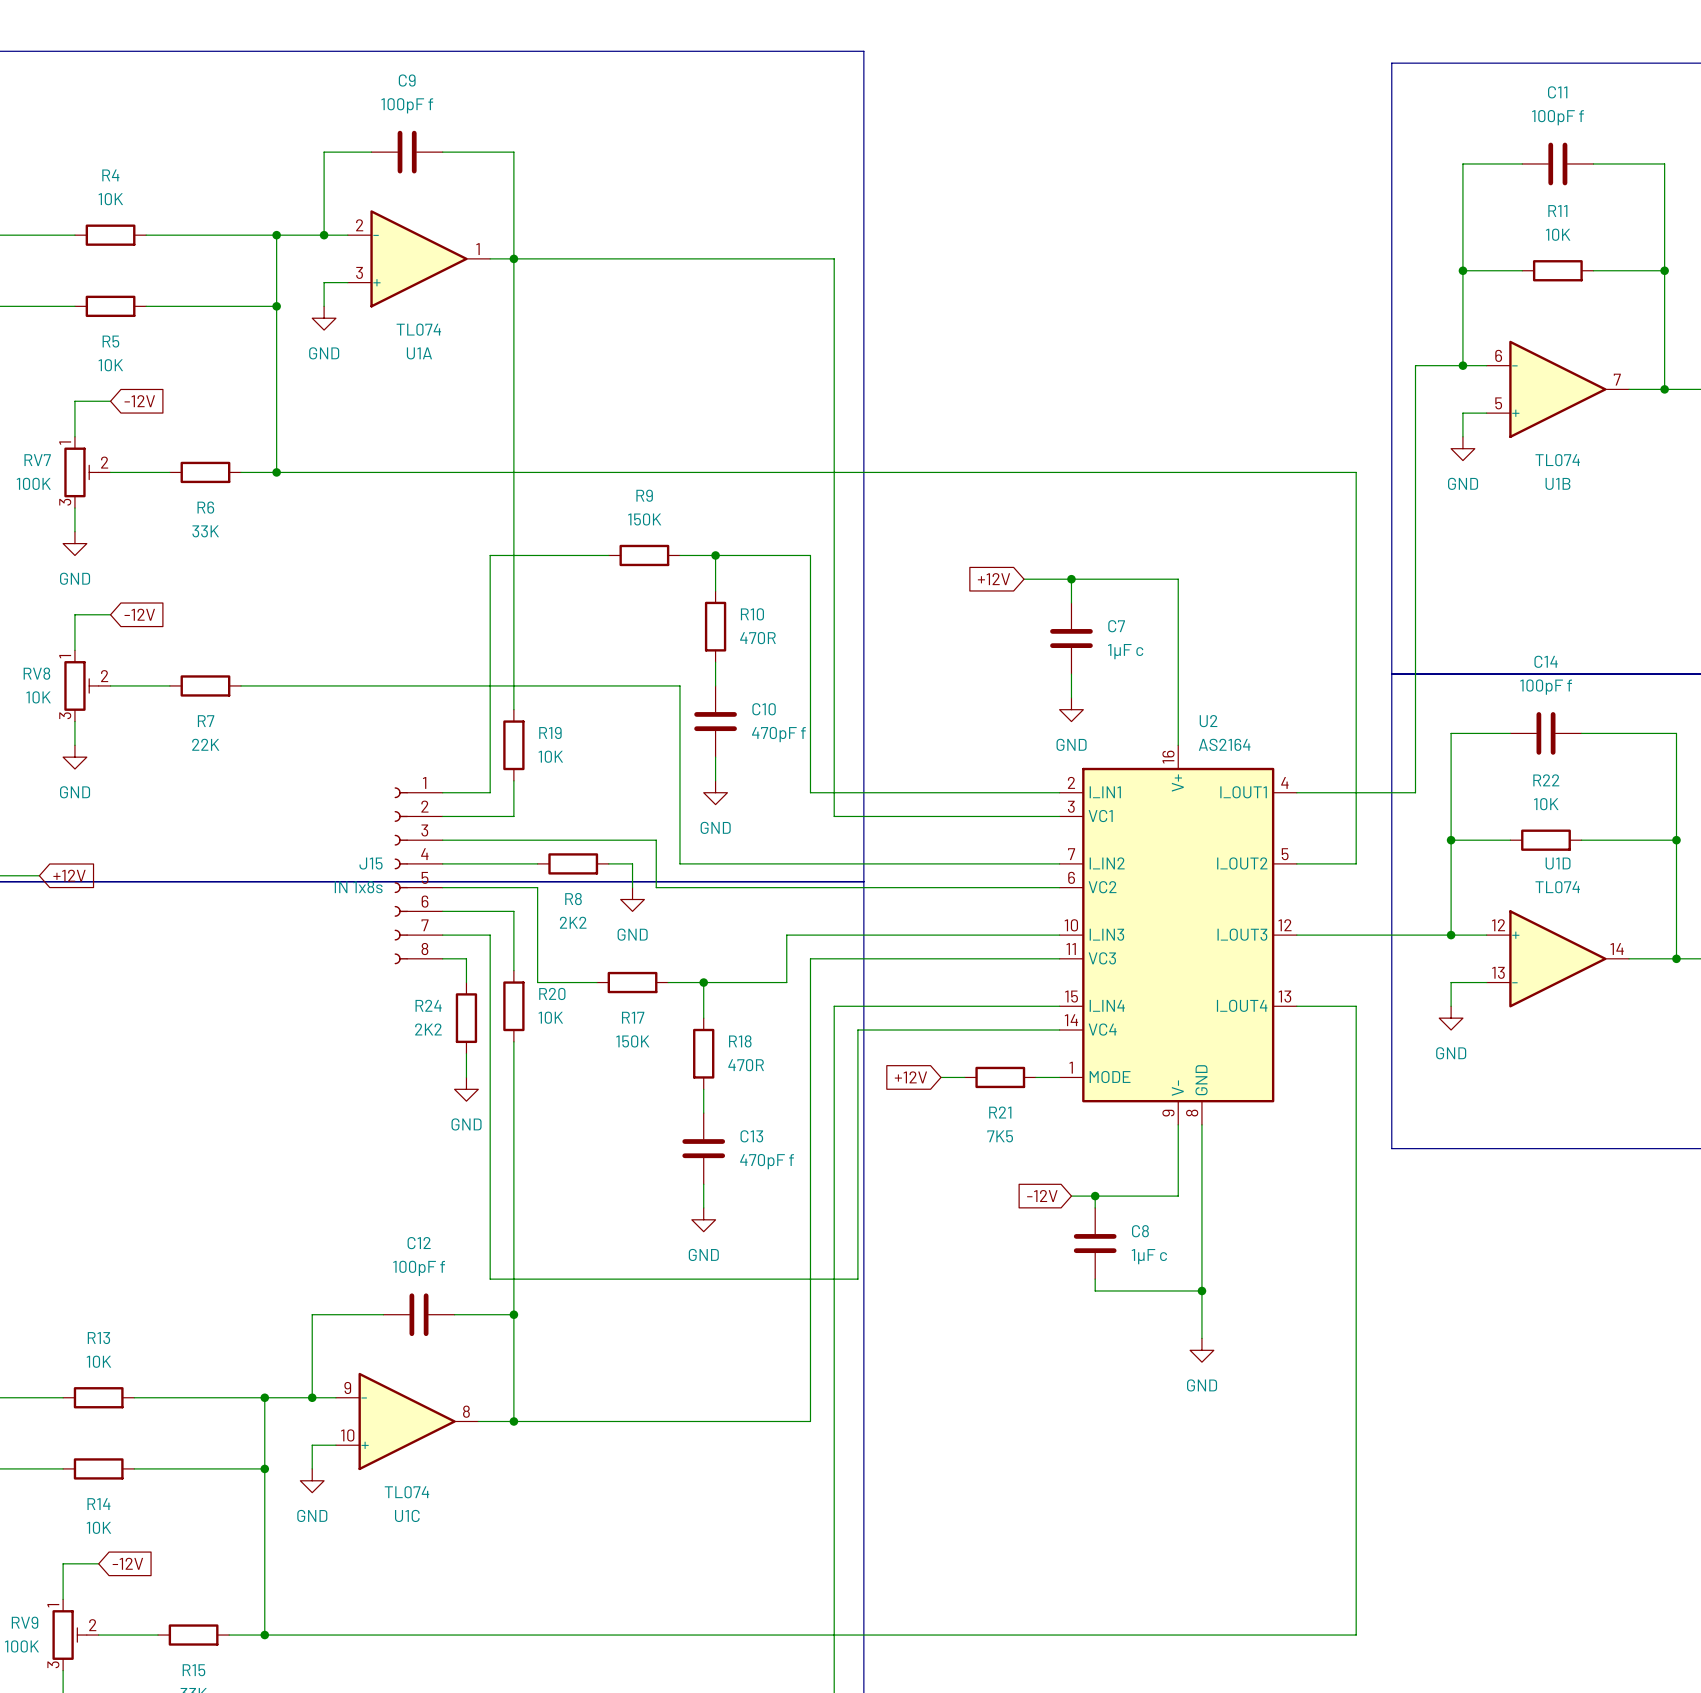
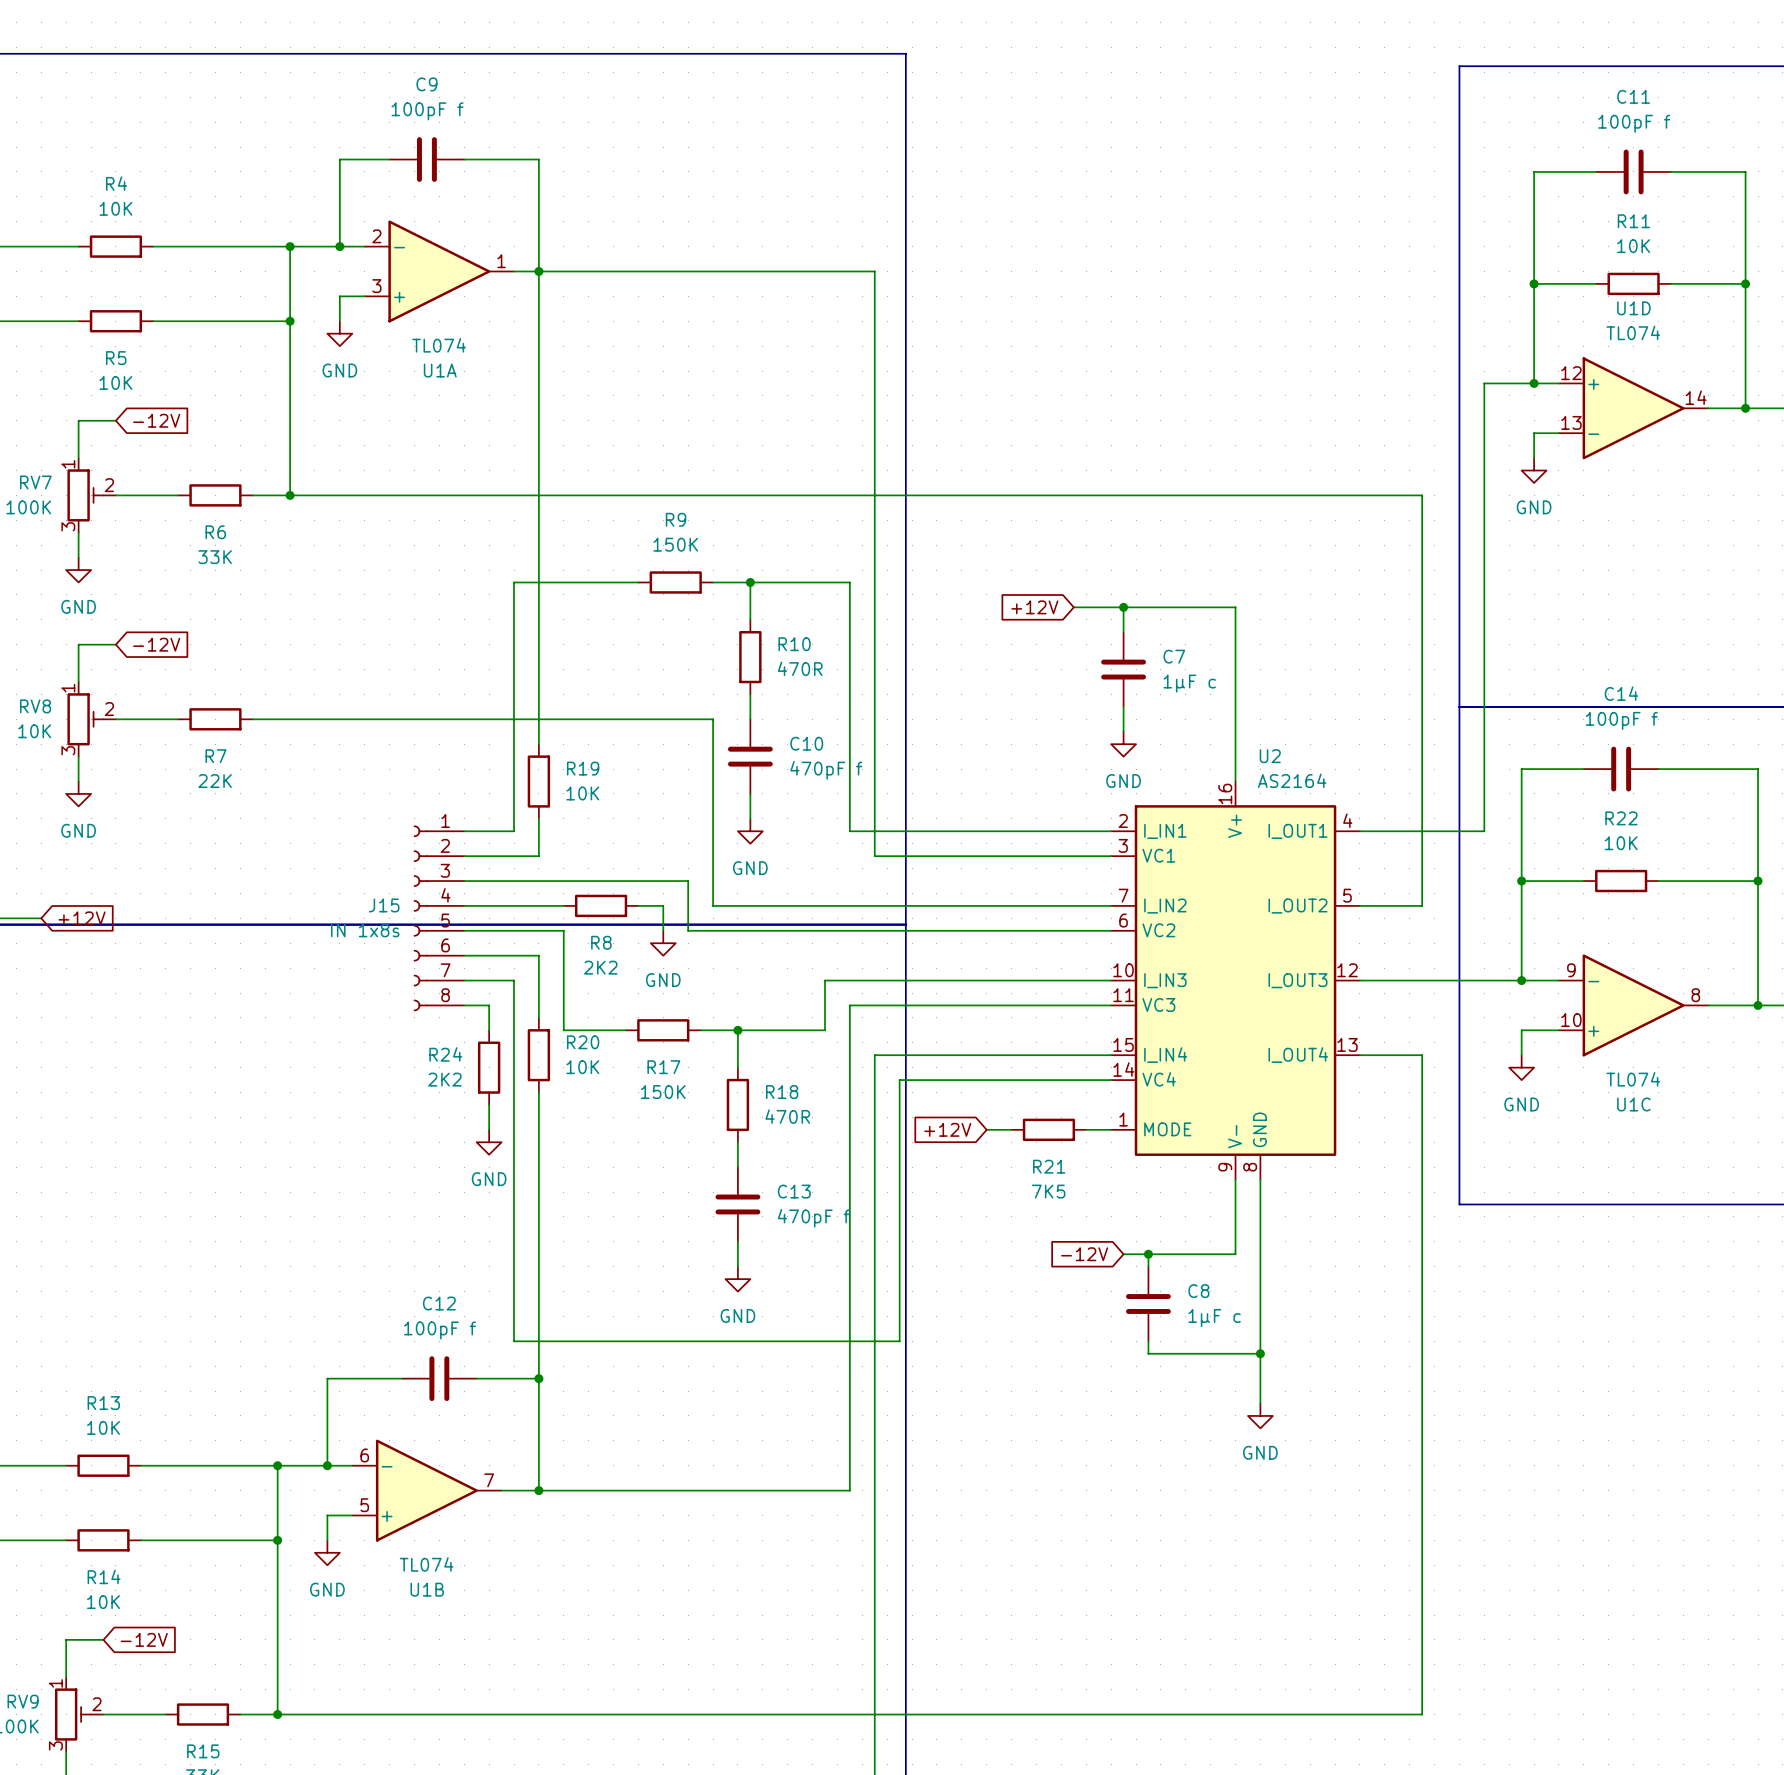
U1B position: (1557, 389) -> (426, 1490)
U1D position: (1557, 958) -> (1633, 408)
U1C position: (407, 1421) -> (1633, 1005)

